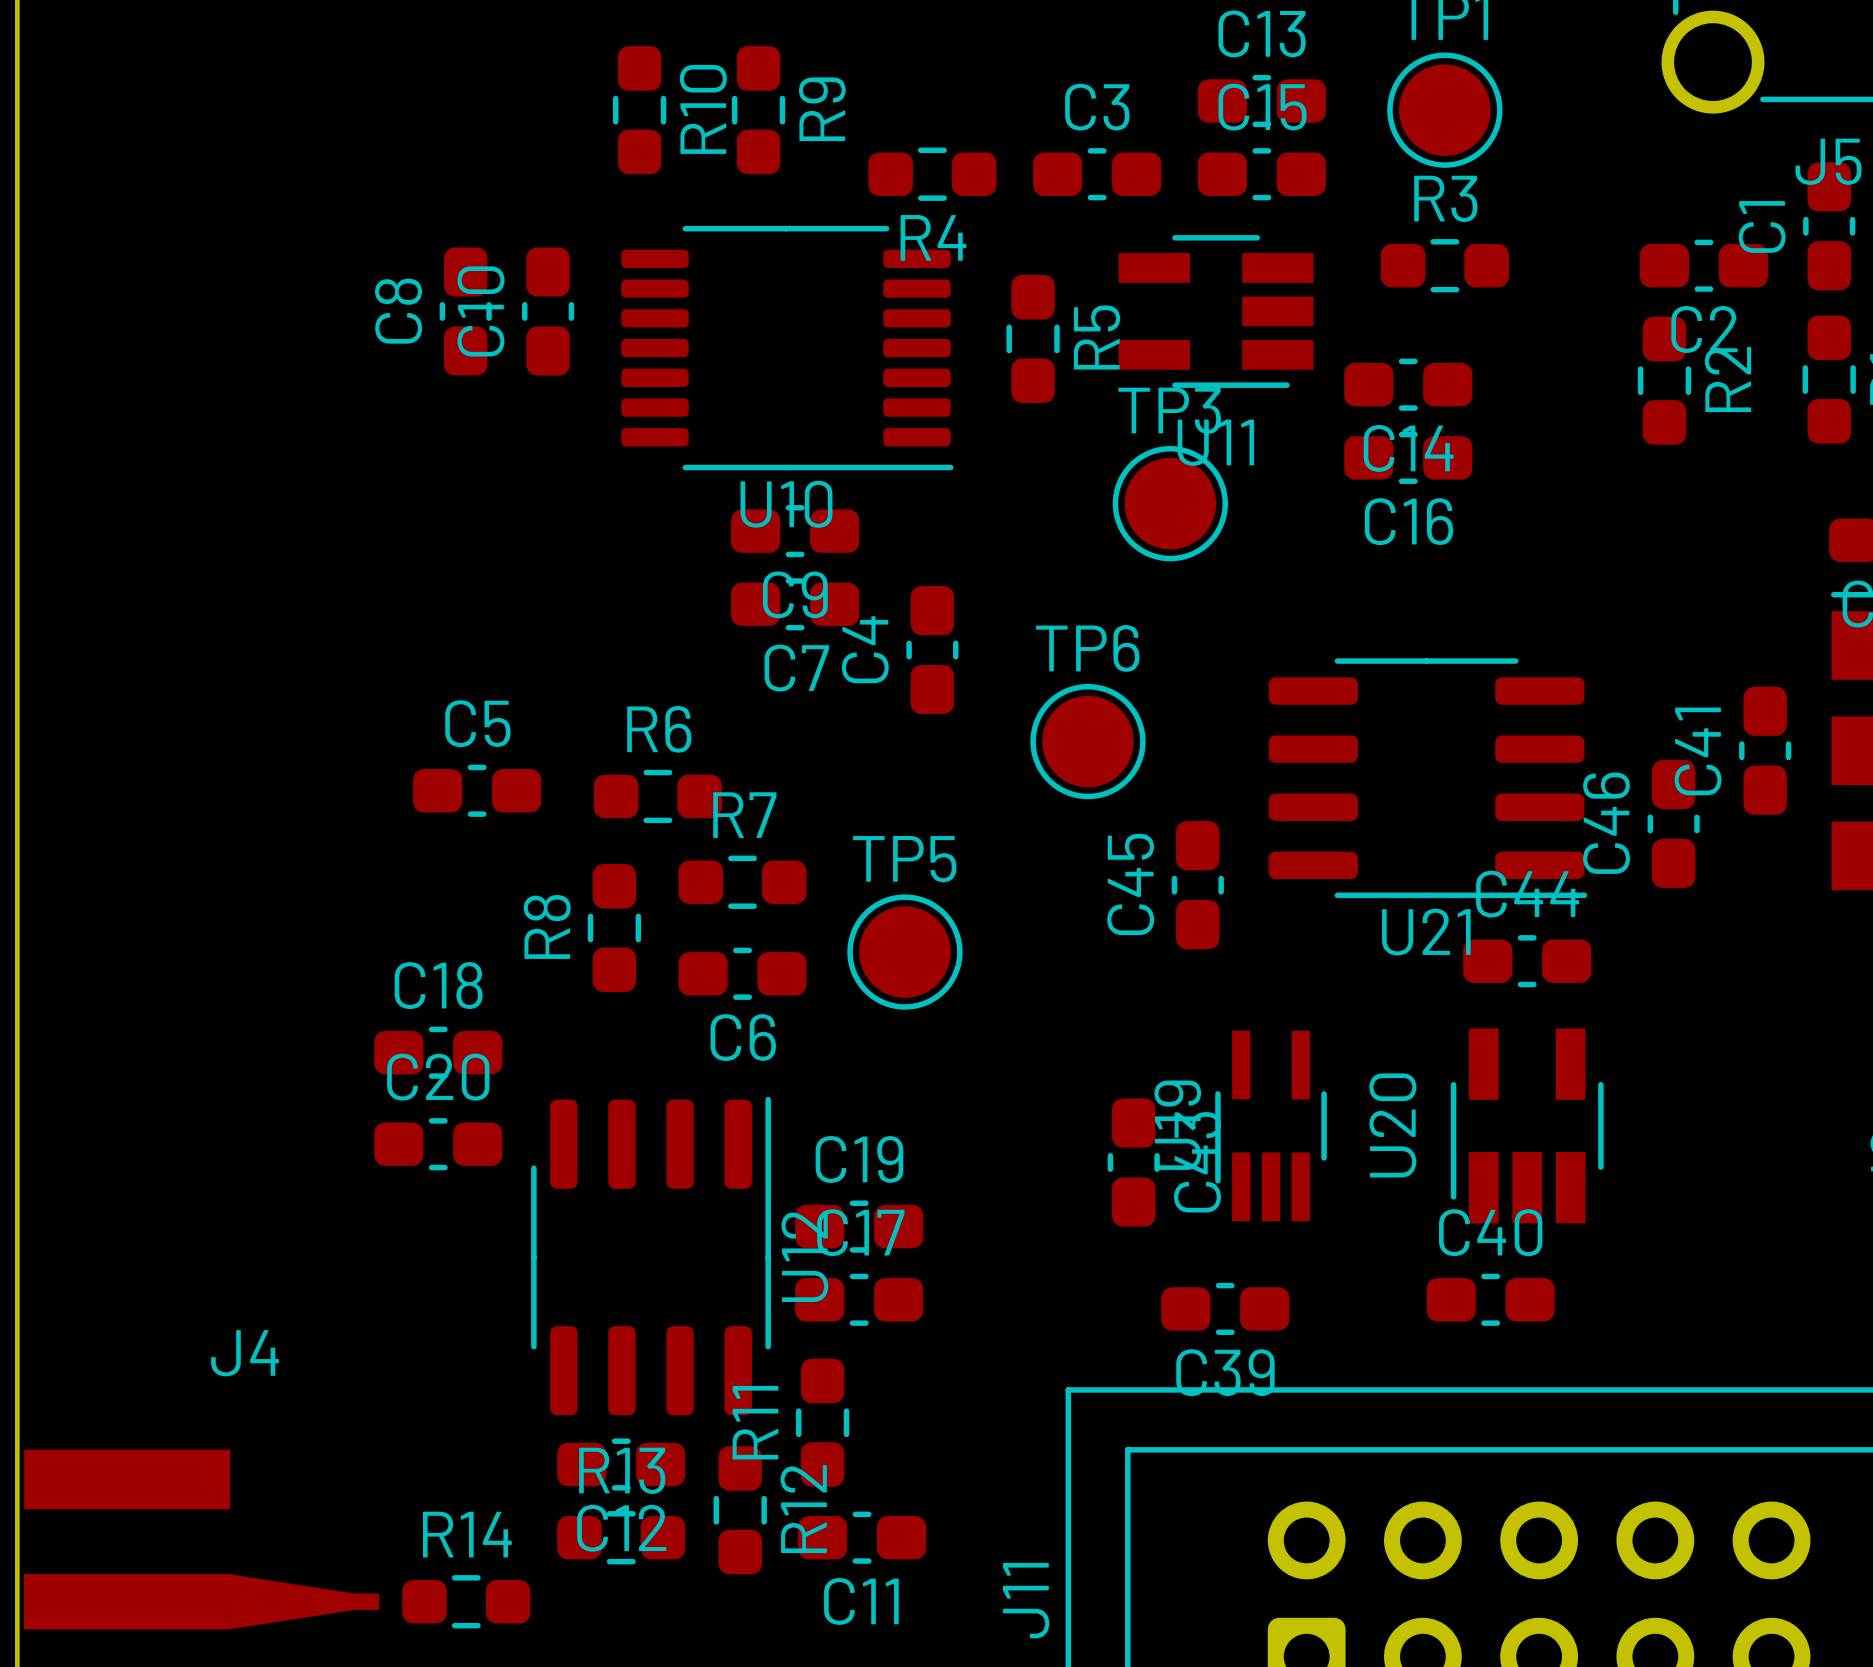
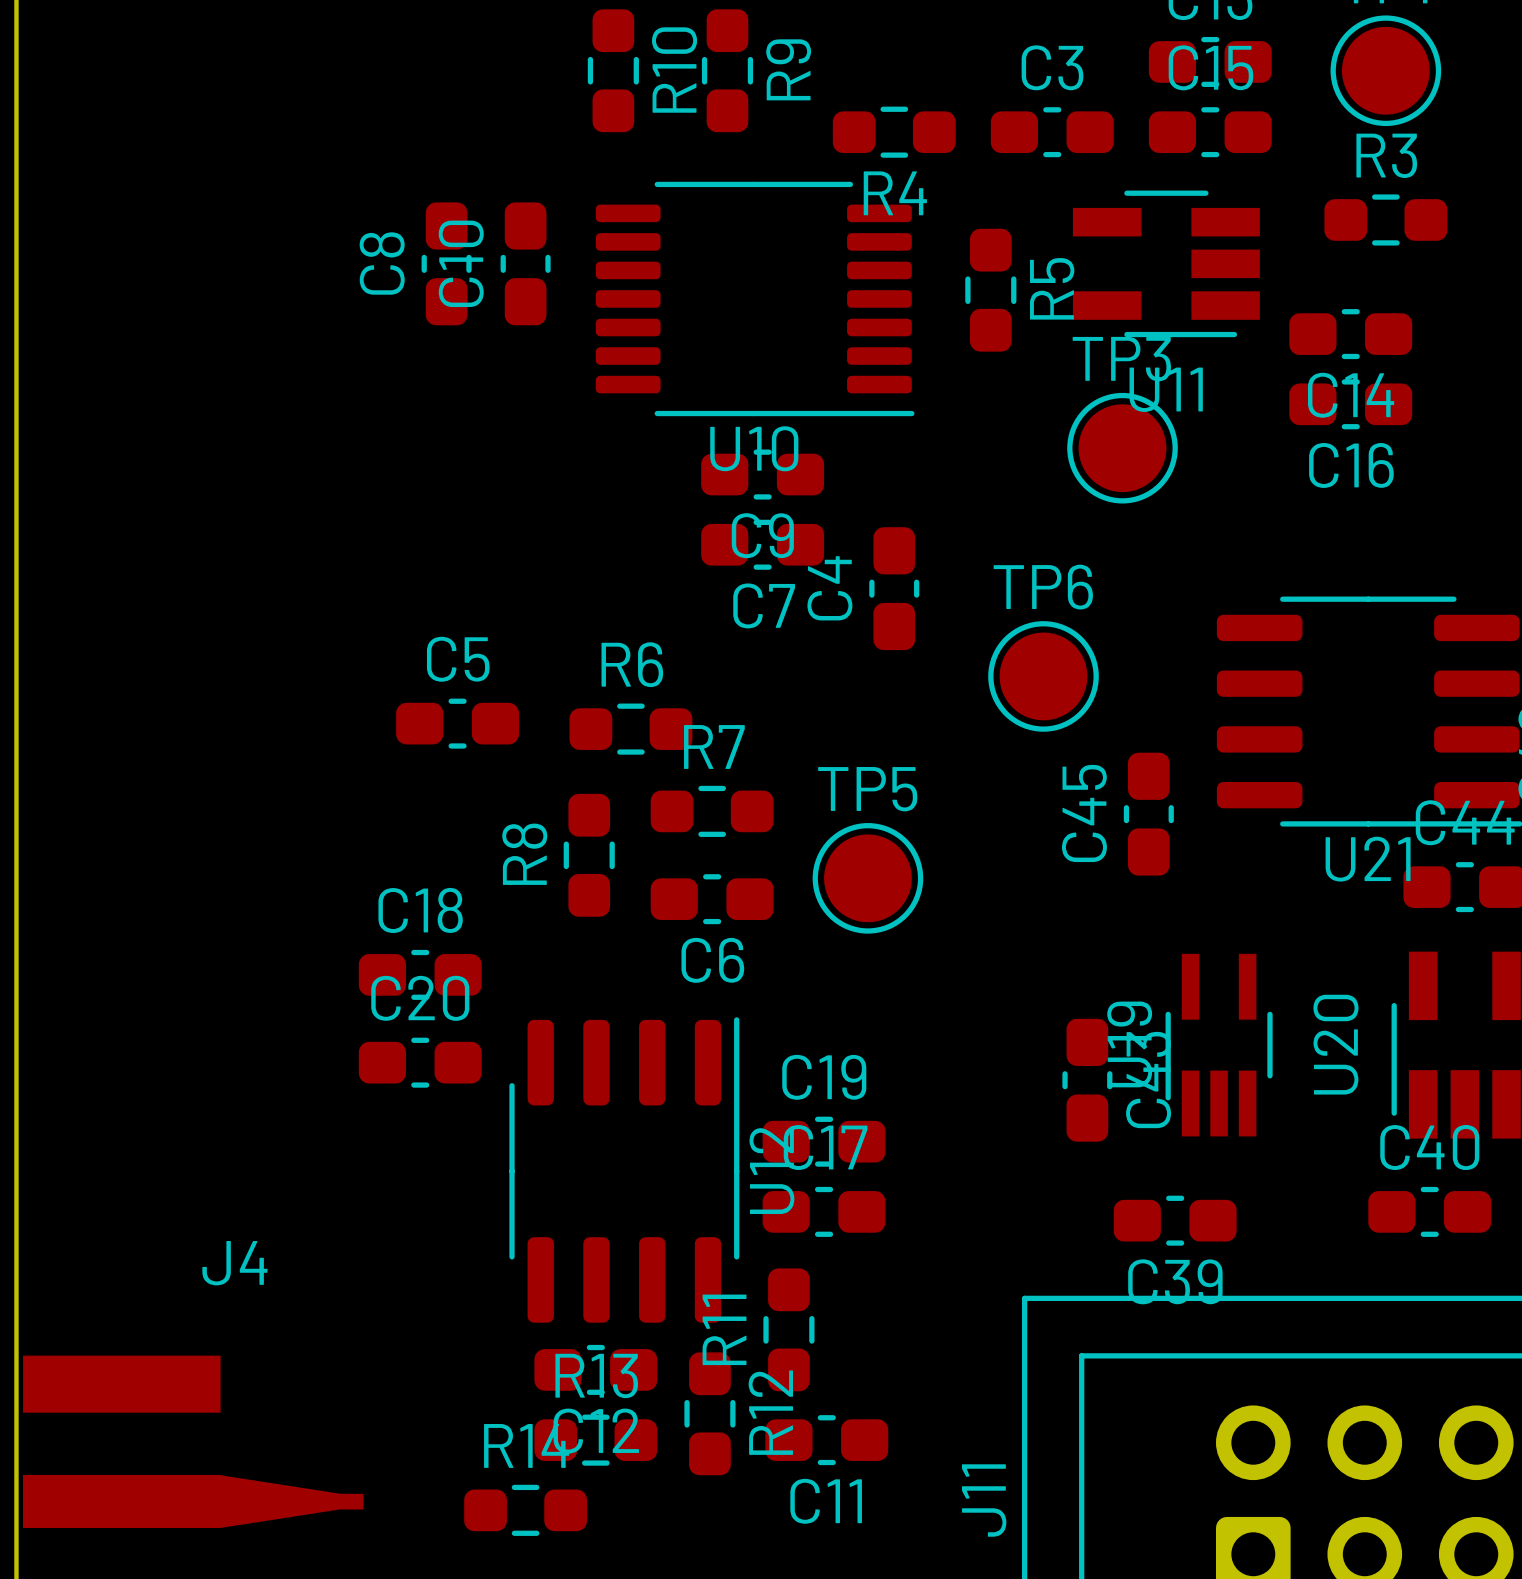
R14 position: (466, 1601) -> (525, 1510)

